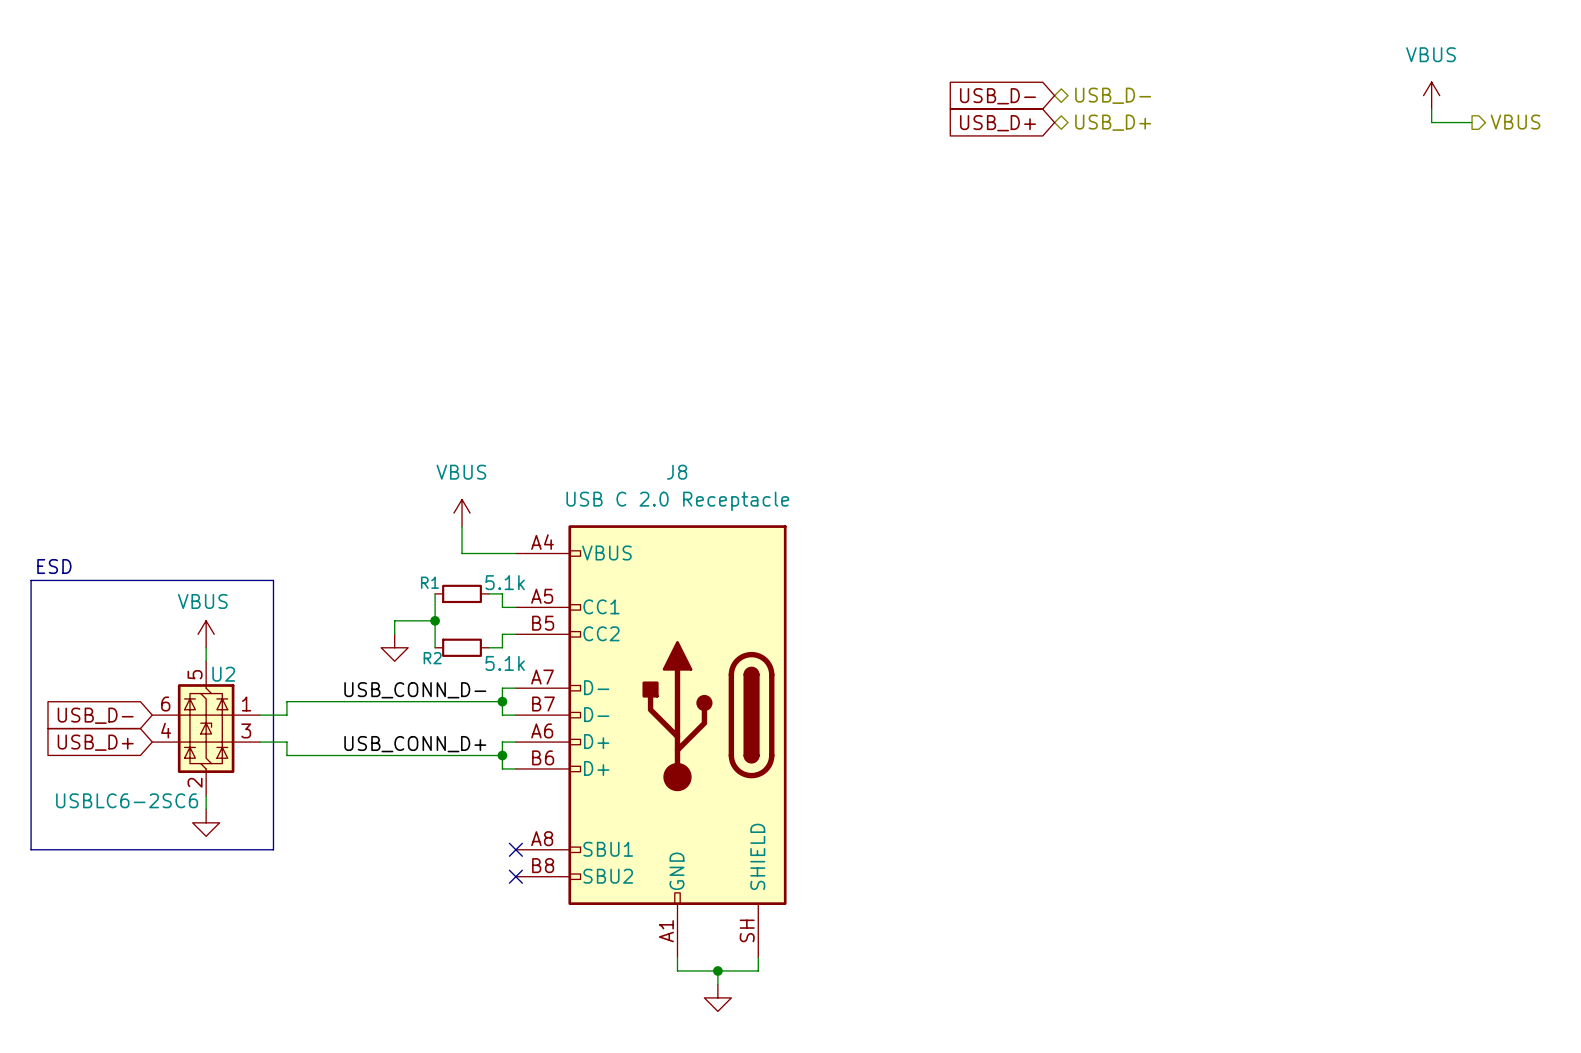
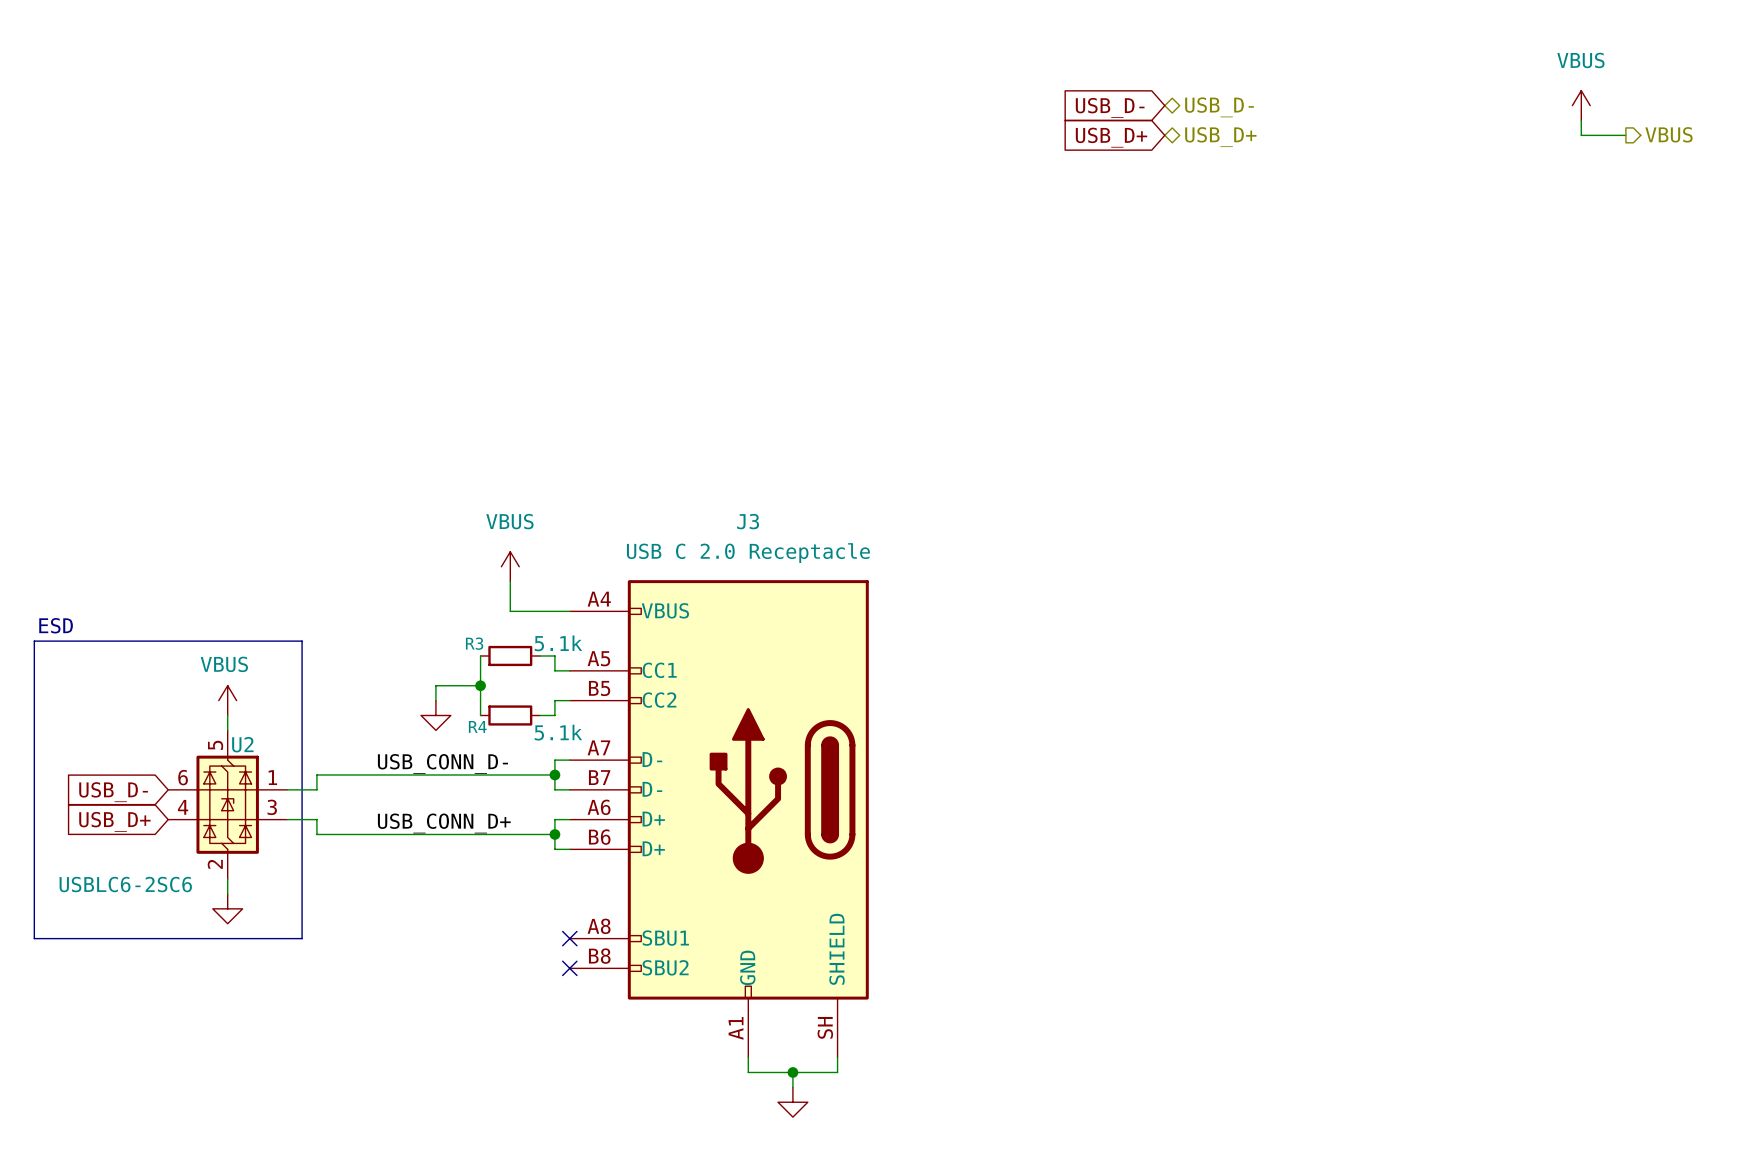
J8 name: J8 (677, 472) -> J3 (748, 521)
R1 name: R1 (429, 582) -> R3 (474, 643)
R2 name: R2 (432, 658) -> R4 (477, 726)

